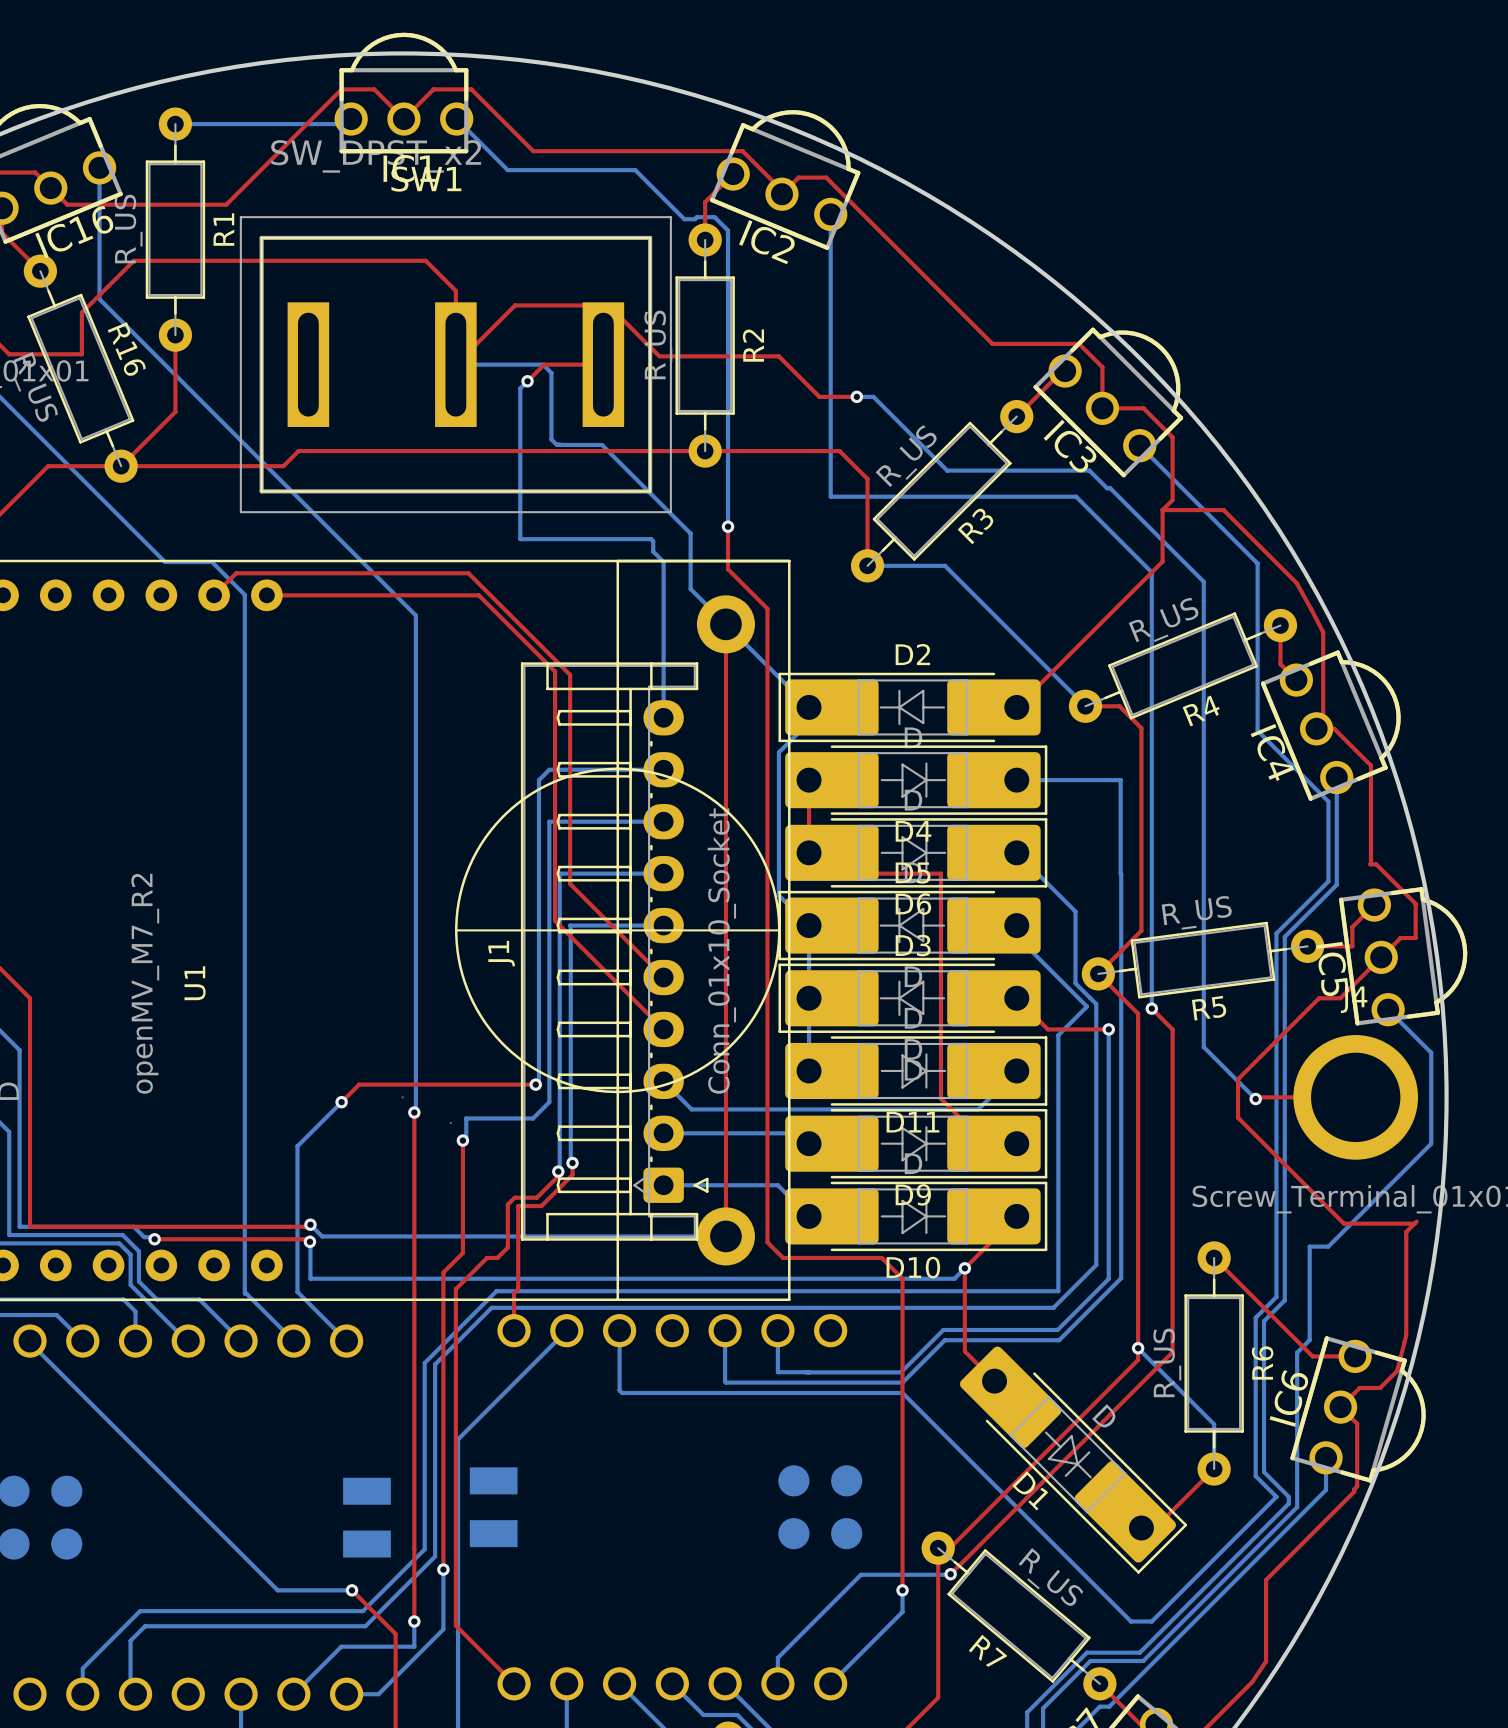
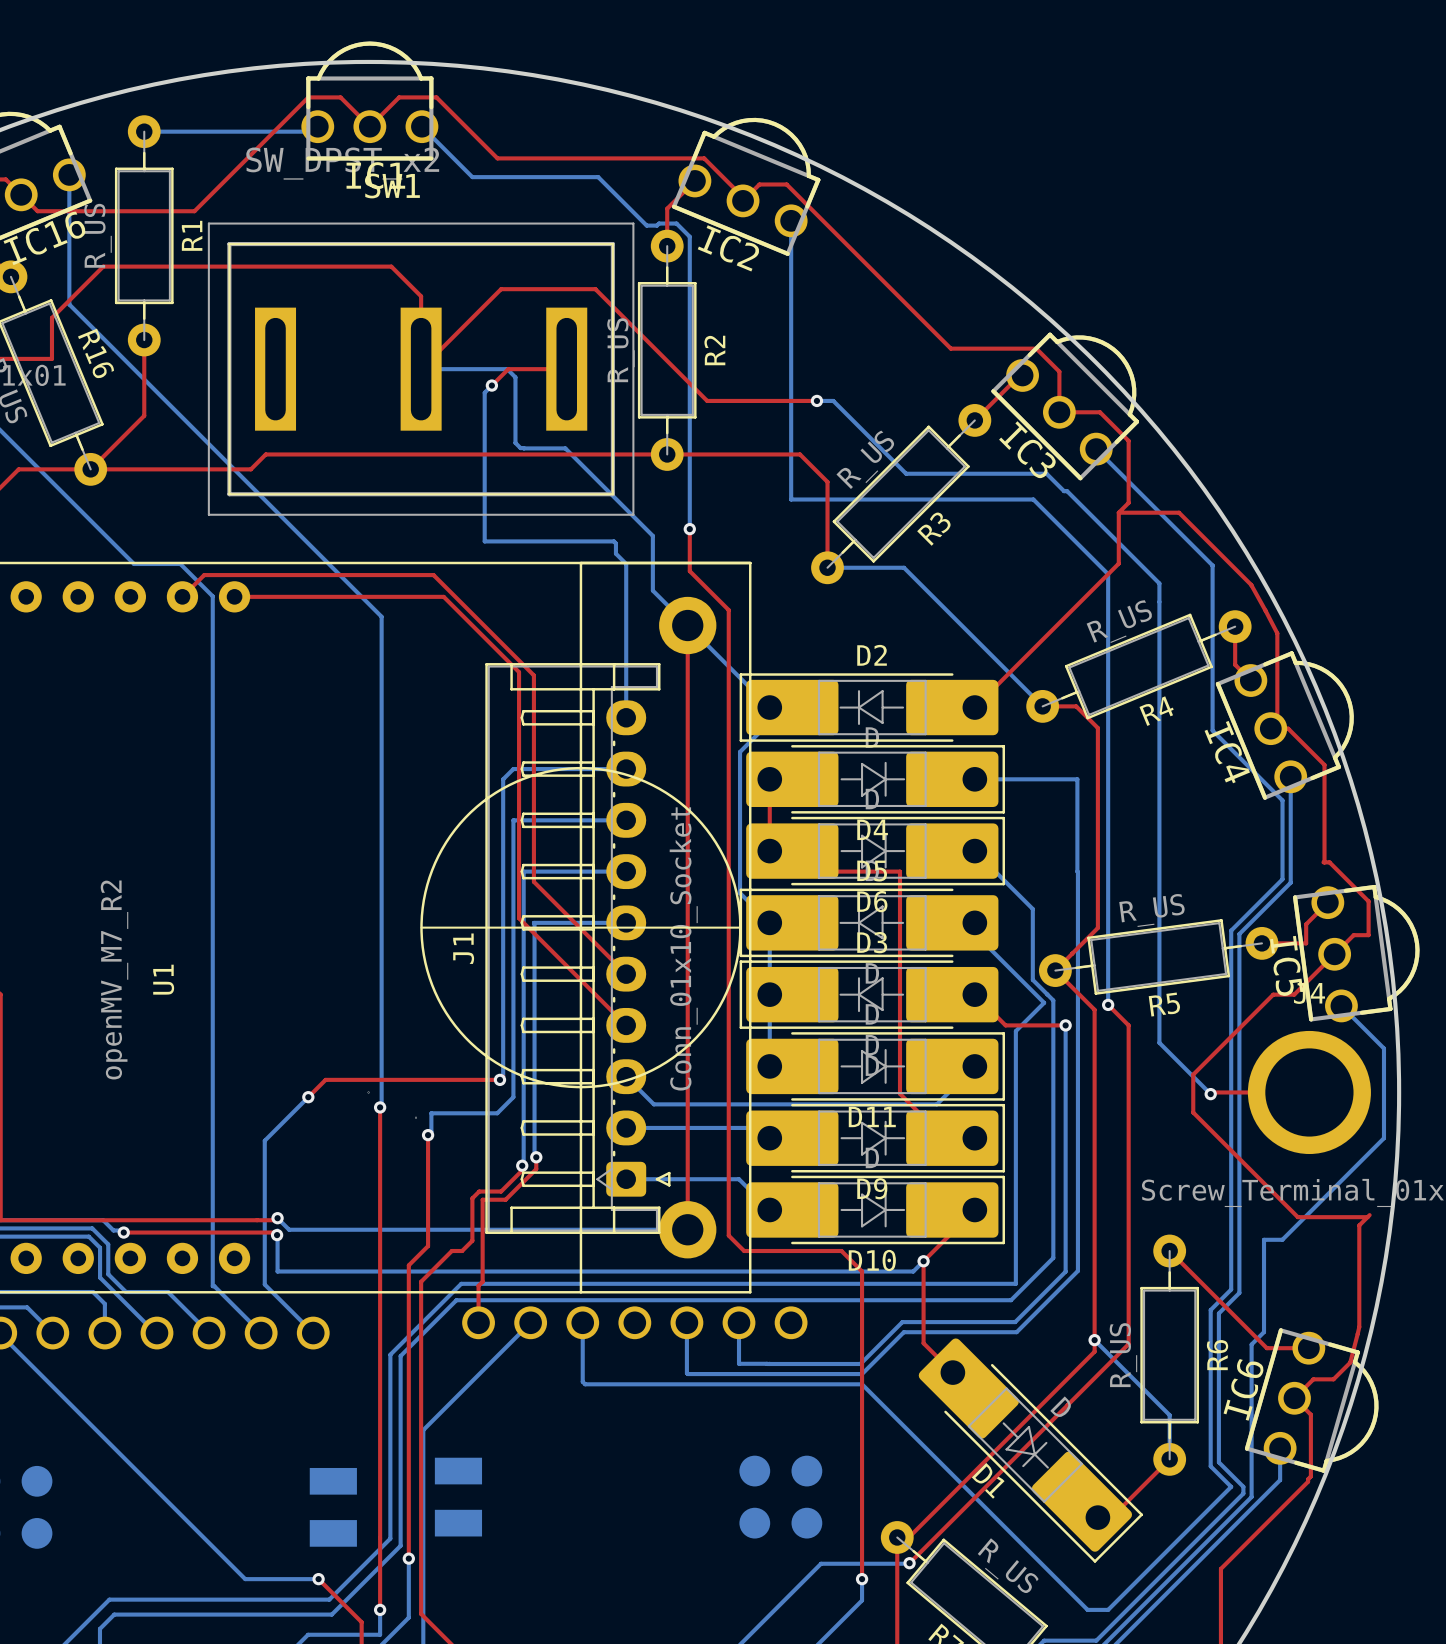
top track: (515, 305) (608, 305) (659, 356) (778, 356) (819, 396) -> (479, 310) (501, 289) (595, 289) (707, 400) (780, 400)

